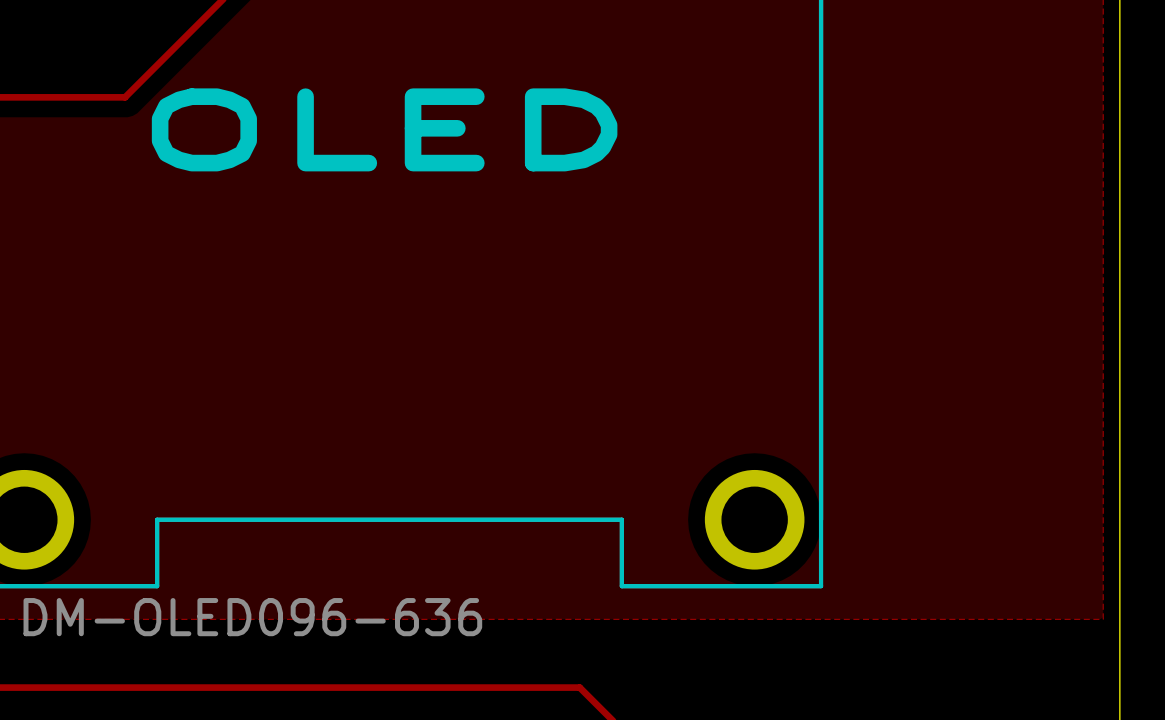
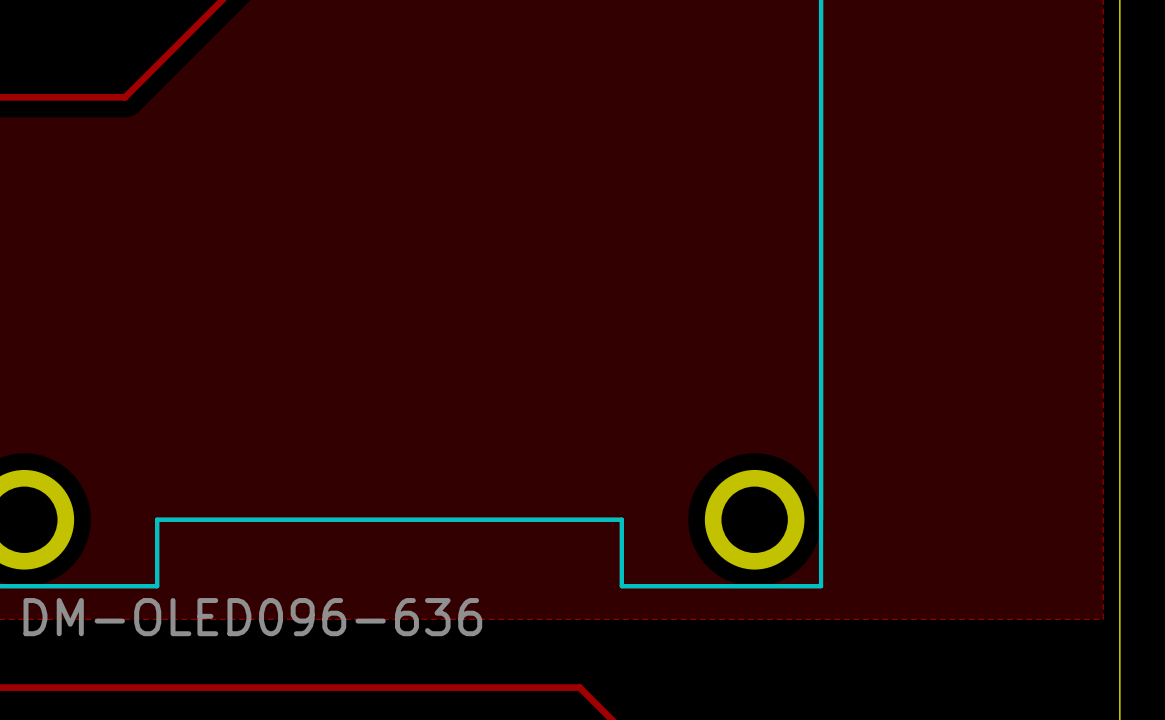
text: OLED (384, 129) -> none

